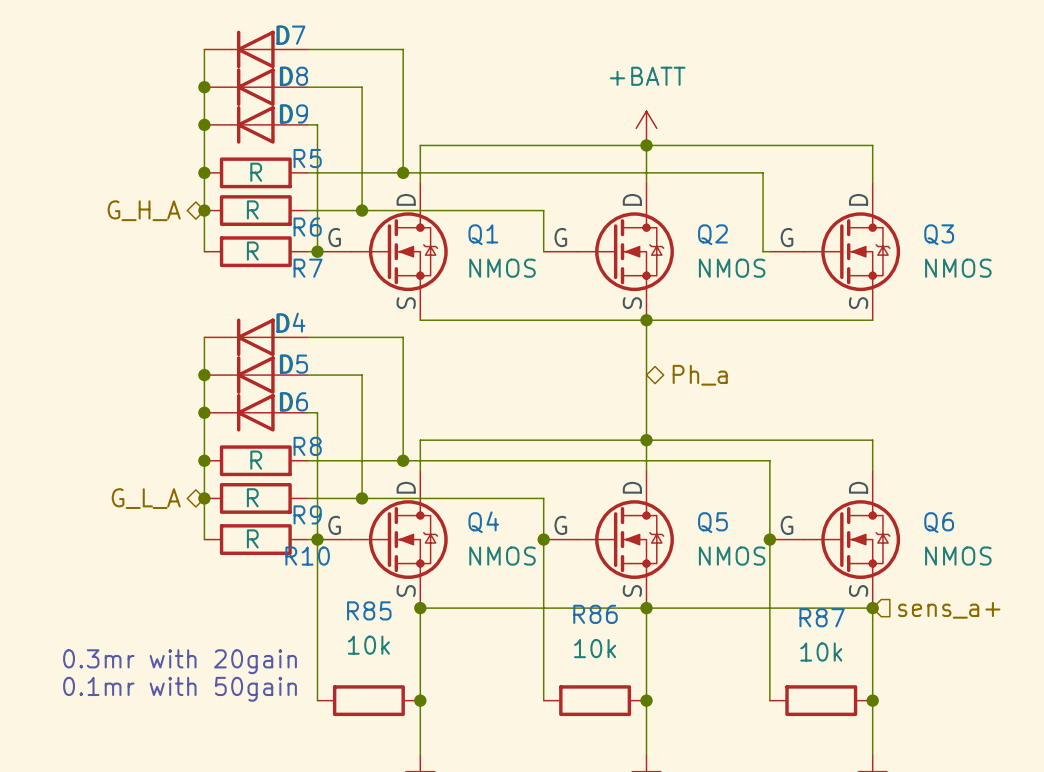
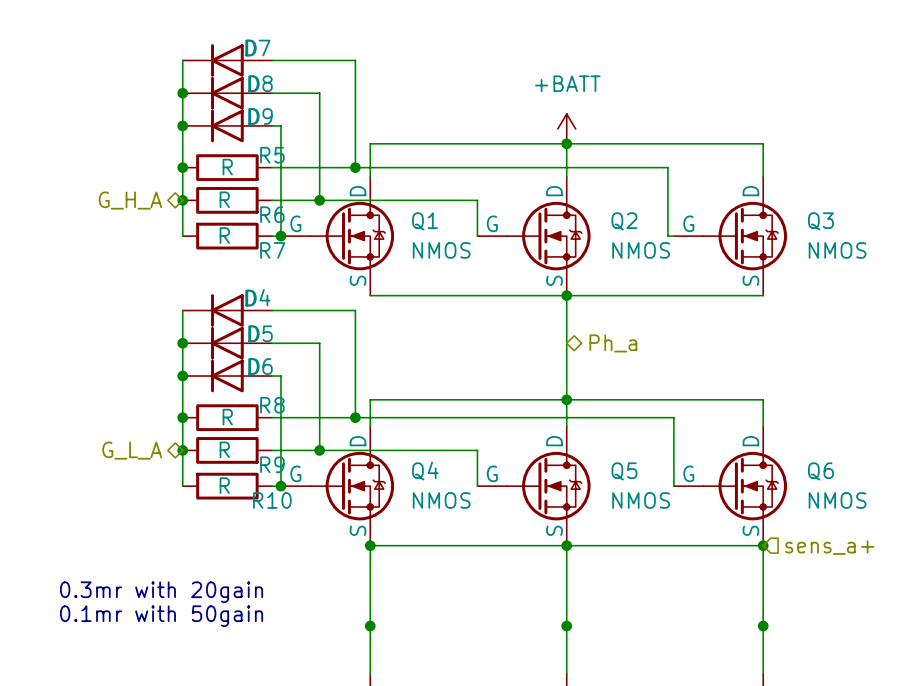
wire: (317, 539) (317, 700) -> none
wire: (543, 539) (543, 700) -> none
junction: (543, 539) -> none
wire: (769, 539) (769, 700) -> none
junction: (769, 539) -> none
R85: 10k (368, 700) -> none
R86: 10k (595, 700) -> none
R87: 10k (821, 700) -> none

